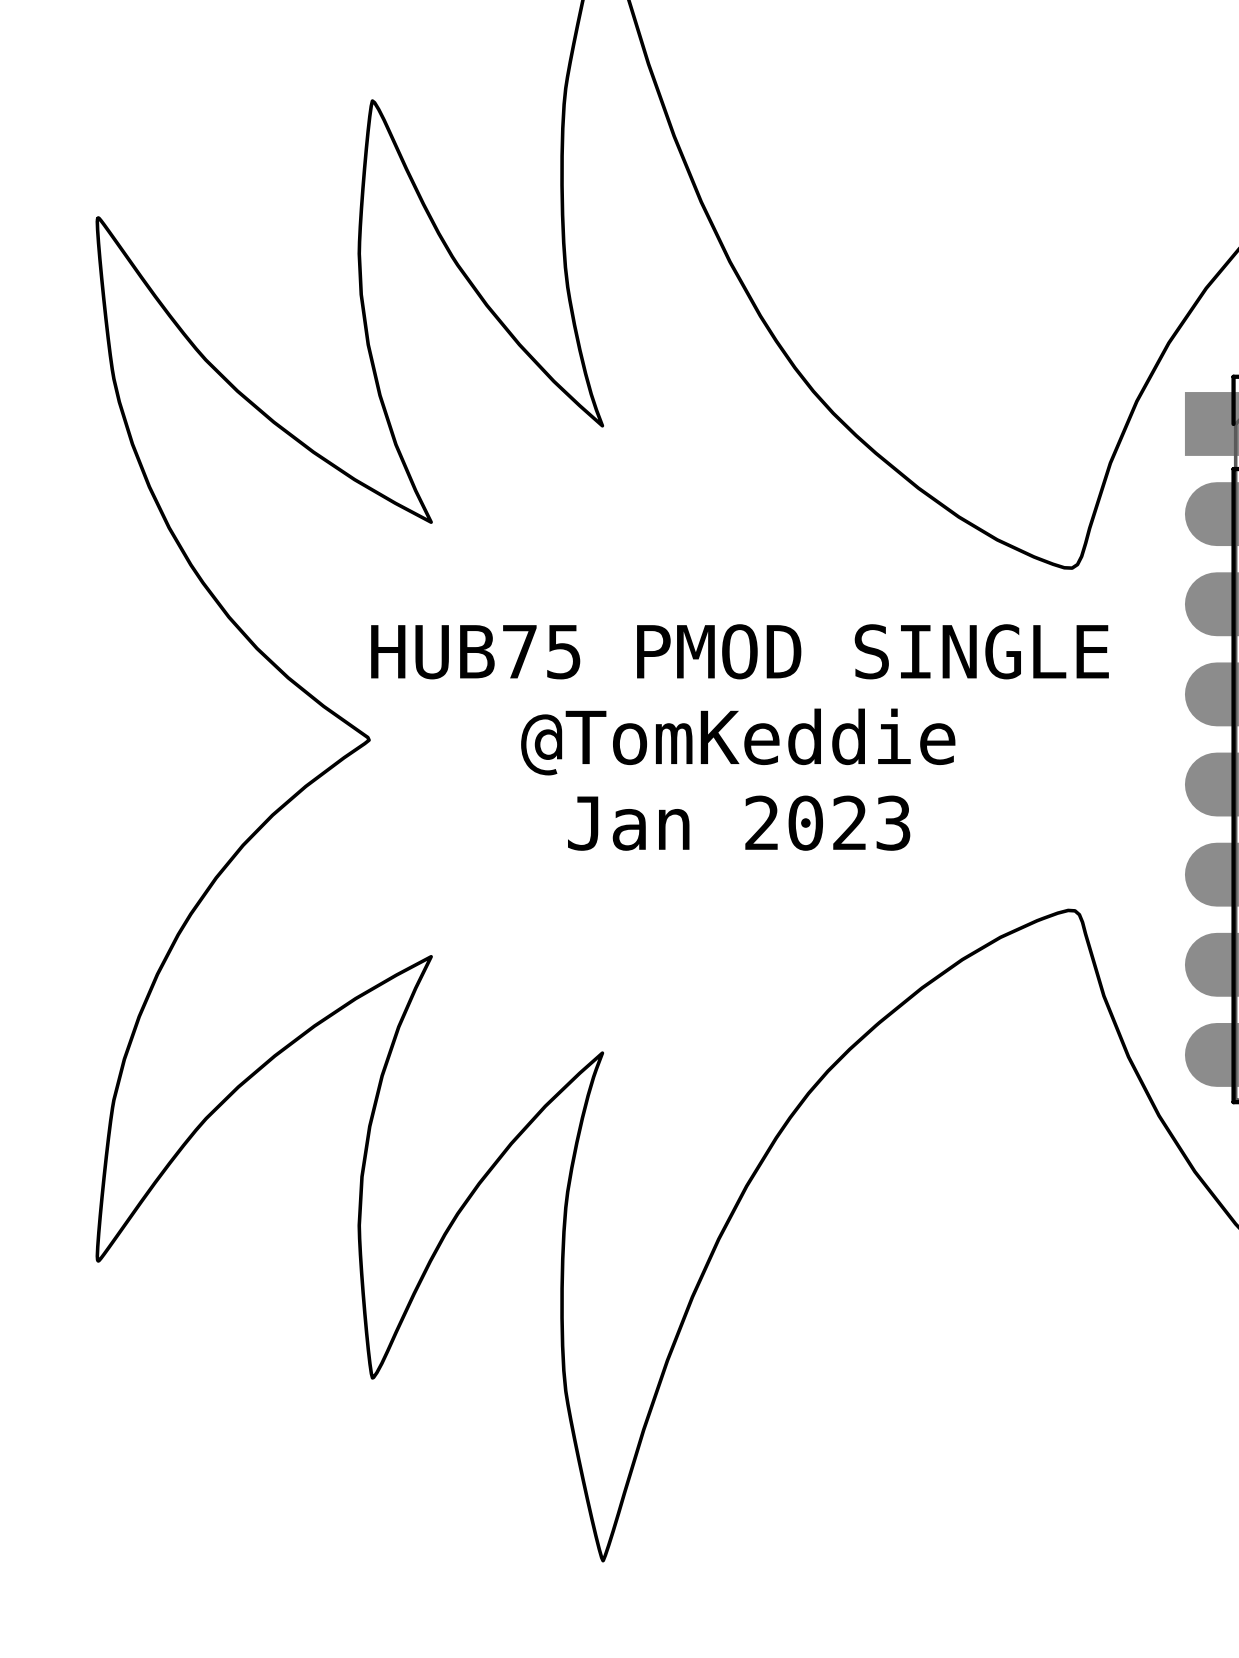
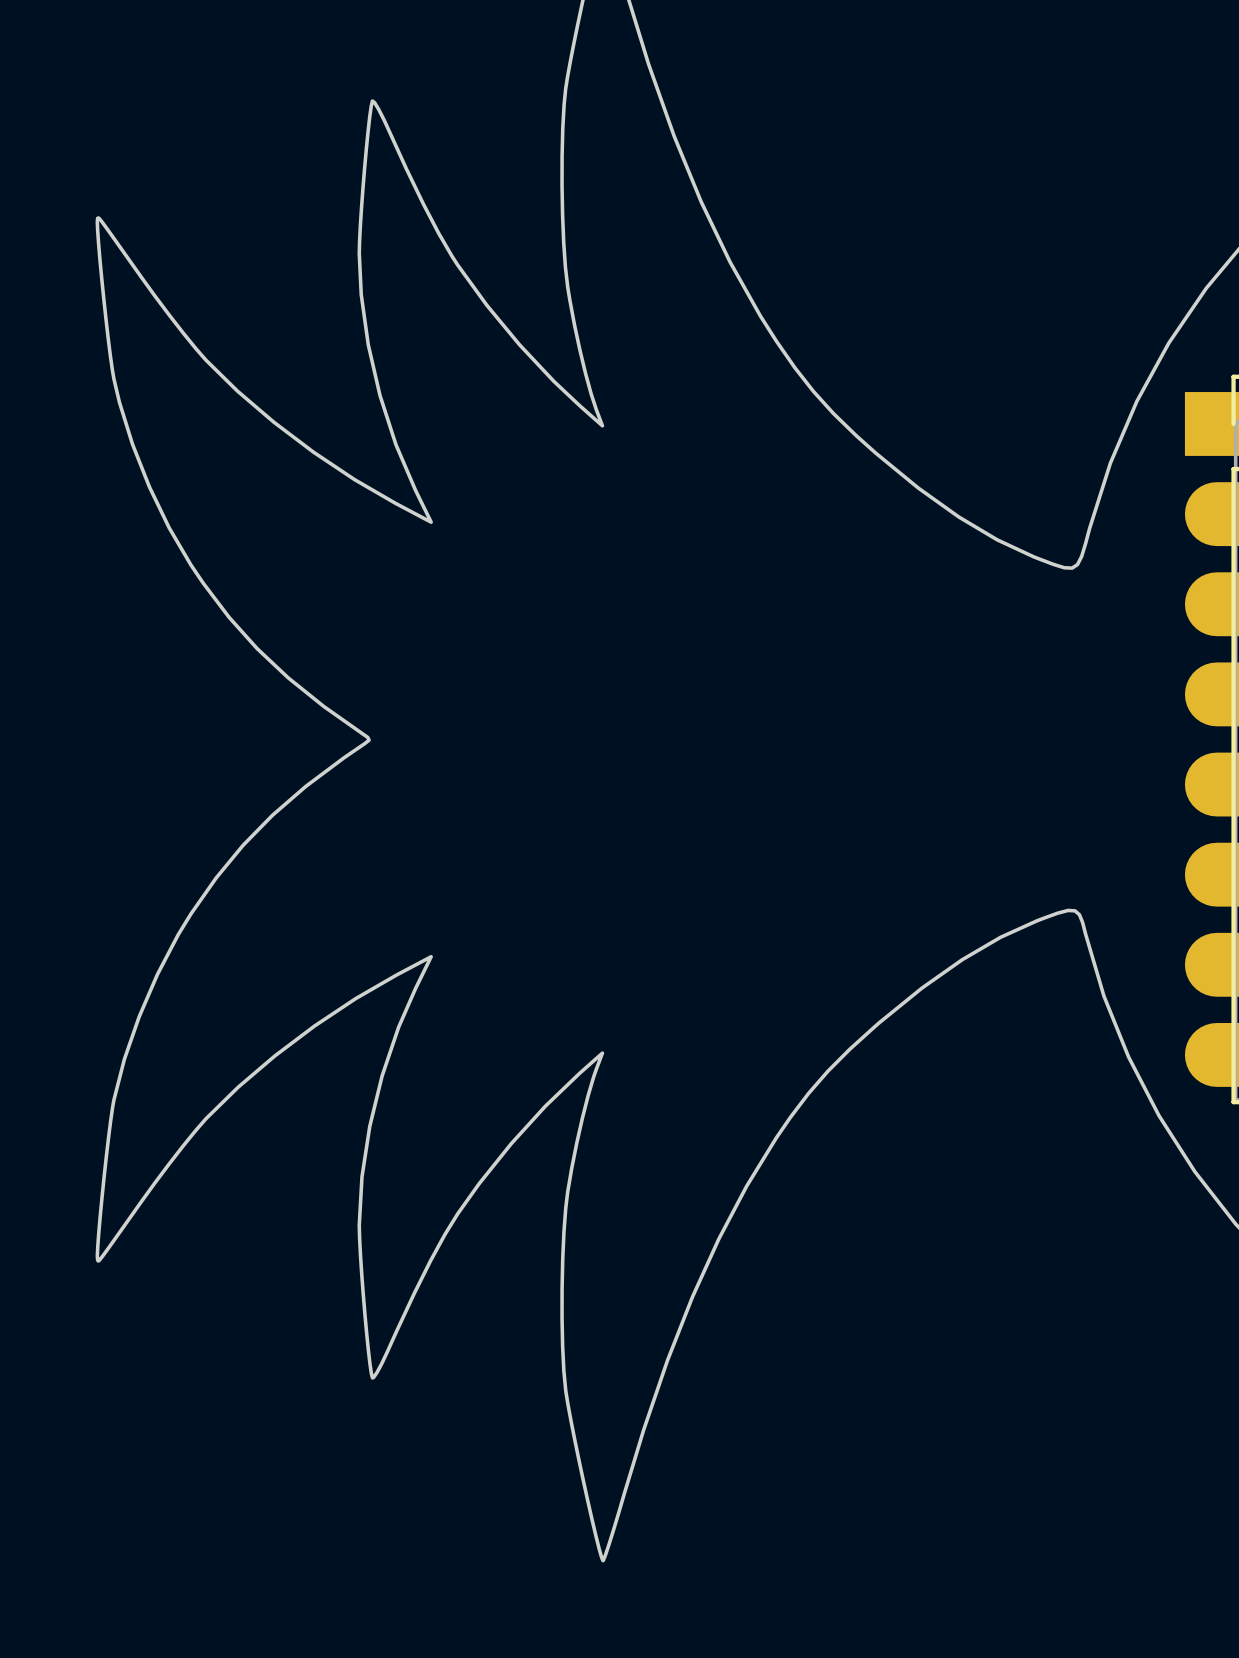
text: HUB75 PMOD SINGLE (740, 651) -> none
text: @TomKeddie (738, 742) -> none
text: Jan 2023 (739, 823) -> none

